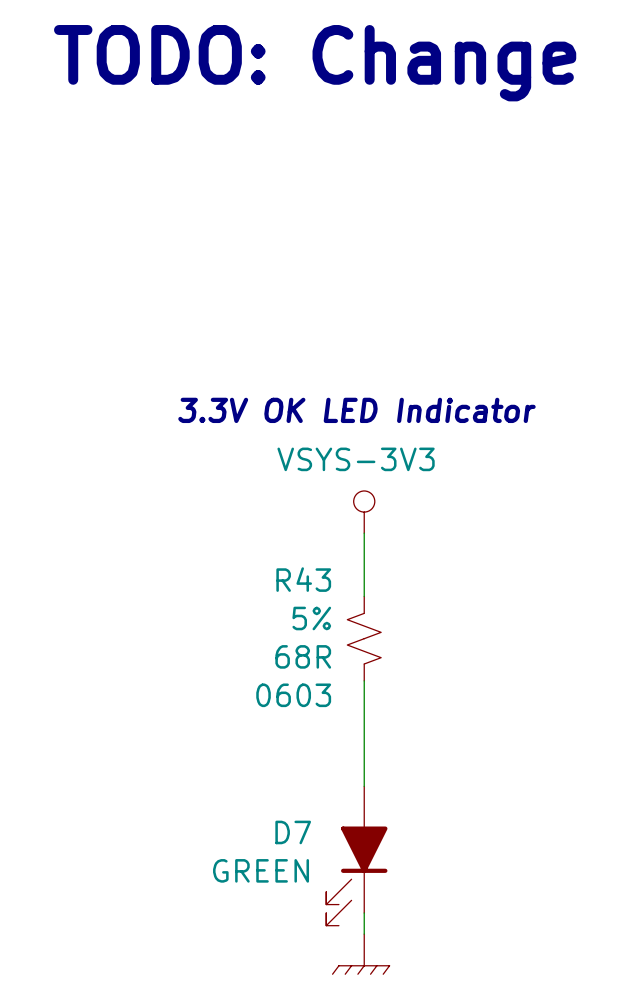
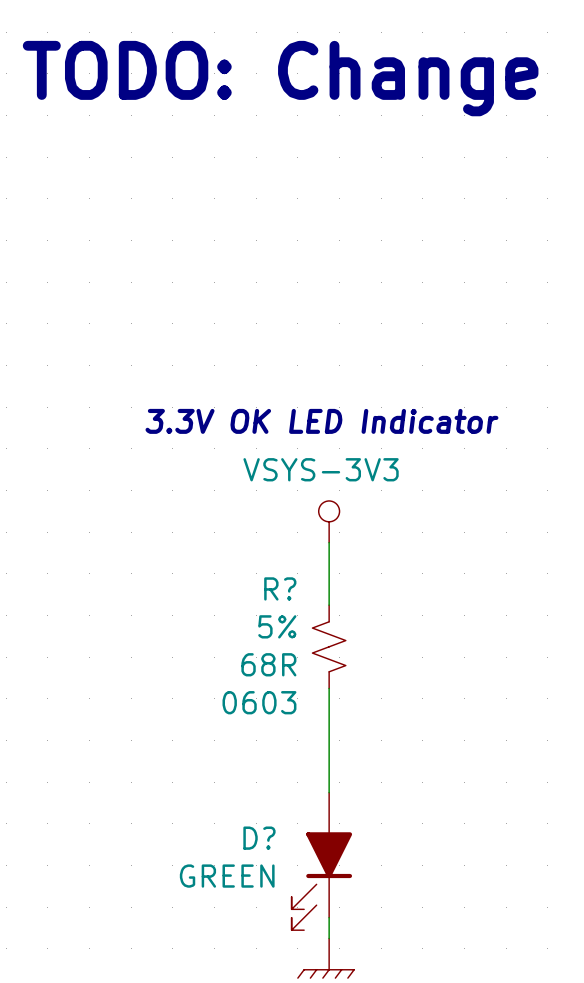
R43 name: R43 (303, 579) -> R? (280, 588)
D7 name: D7 (293, 832) -> D? (259, 838)

